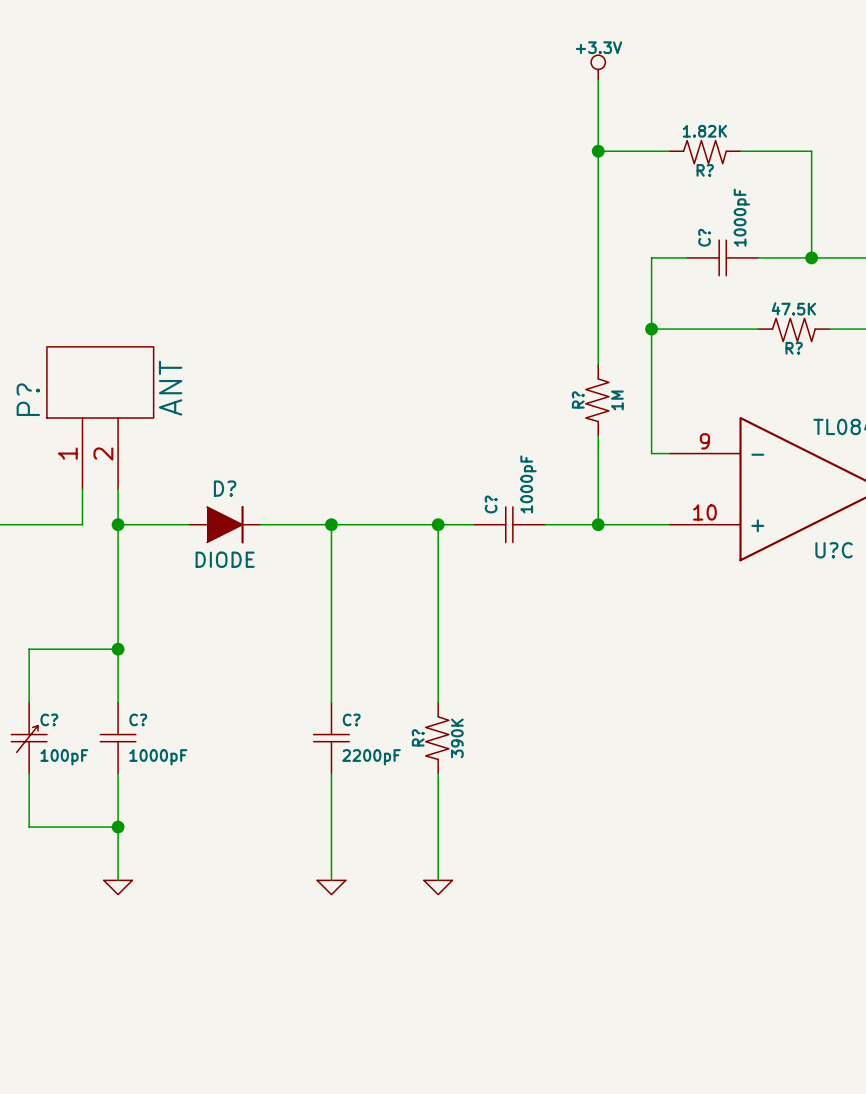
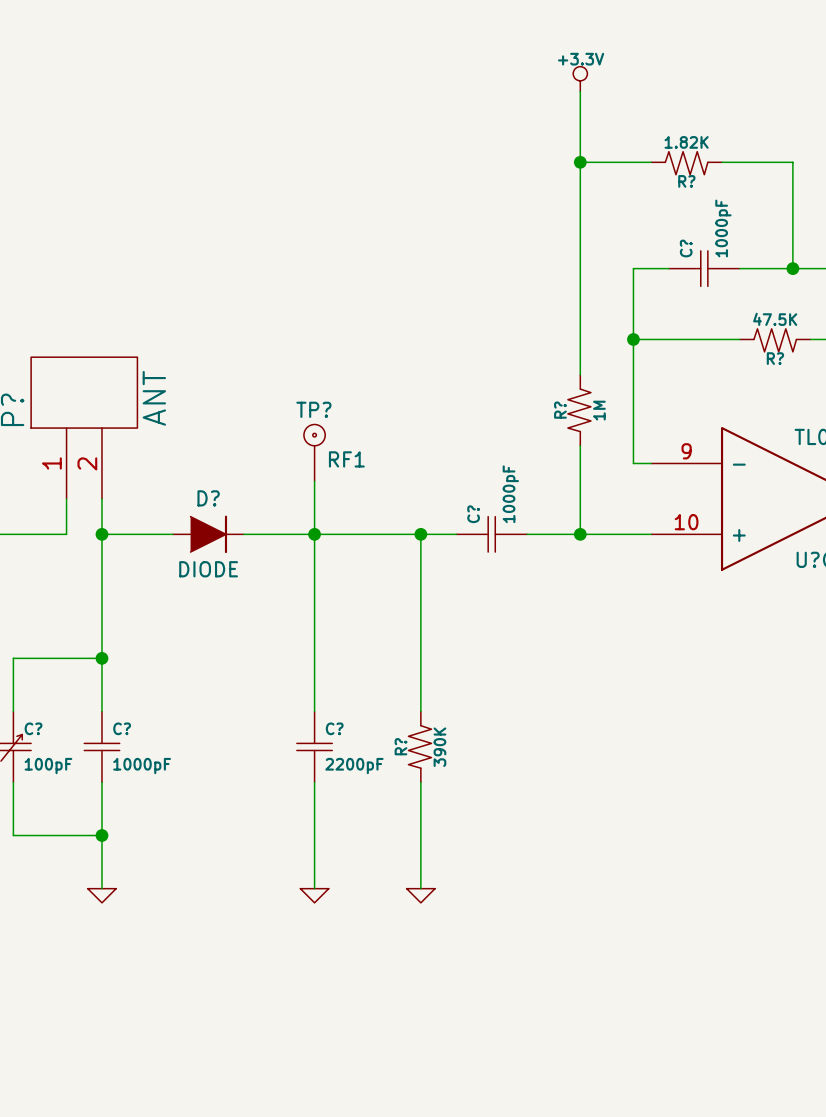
TP?: none -> RF1 (314, 452)
wire: none -> (314, 481) (314, 534)

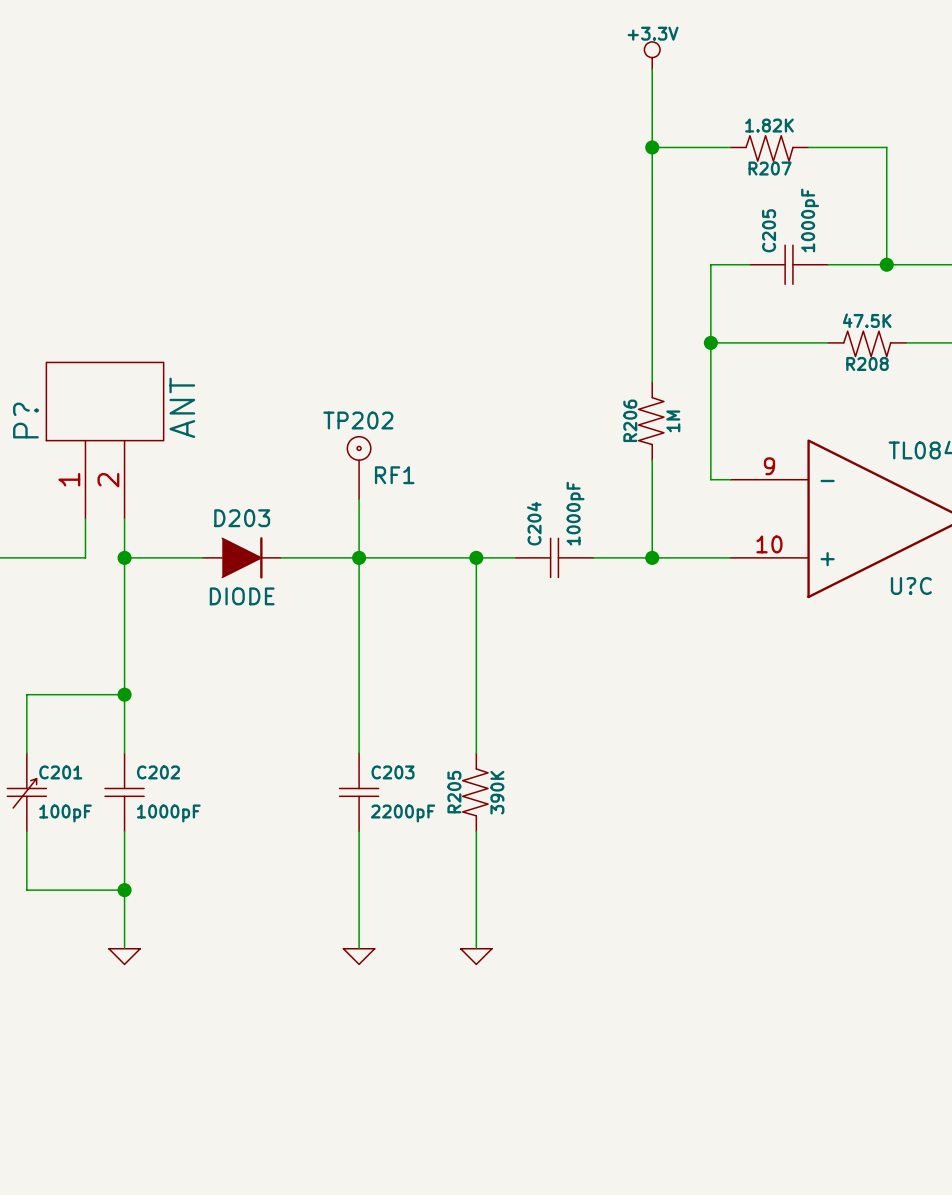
R? name: R? (686, 181) -> R207 (770, 168)
C? name: C? (686, 248) -> C205 (769, 230)
R? name: R? (775, 358) -> R208 (867, 363)
TP? name: TP? (313, 409) -> TP202 (358, 420)
R? name: R? (560, 410) -> R206 (630, 420)
D? name: D? (208, 498) -> D203 (242, 518)
C? name: C? (473, 514) -> C204 (534, 523)
C? name: C? (33, 728) -> C201 (60, 772)
C? name: C? (122, 728) -> C202 (158, 772)
C? name: C? (334, 728) -> C203 (393, 772)
R? name: R? (400, 746) -> R205 (454, 792)

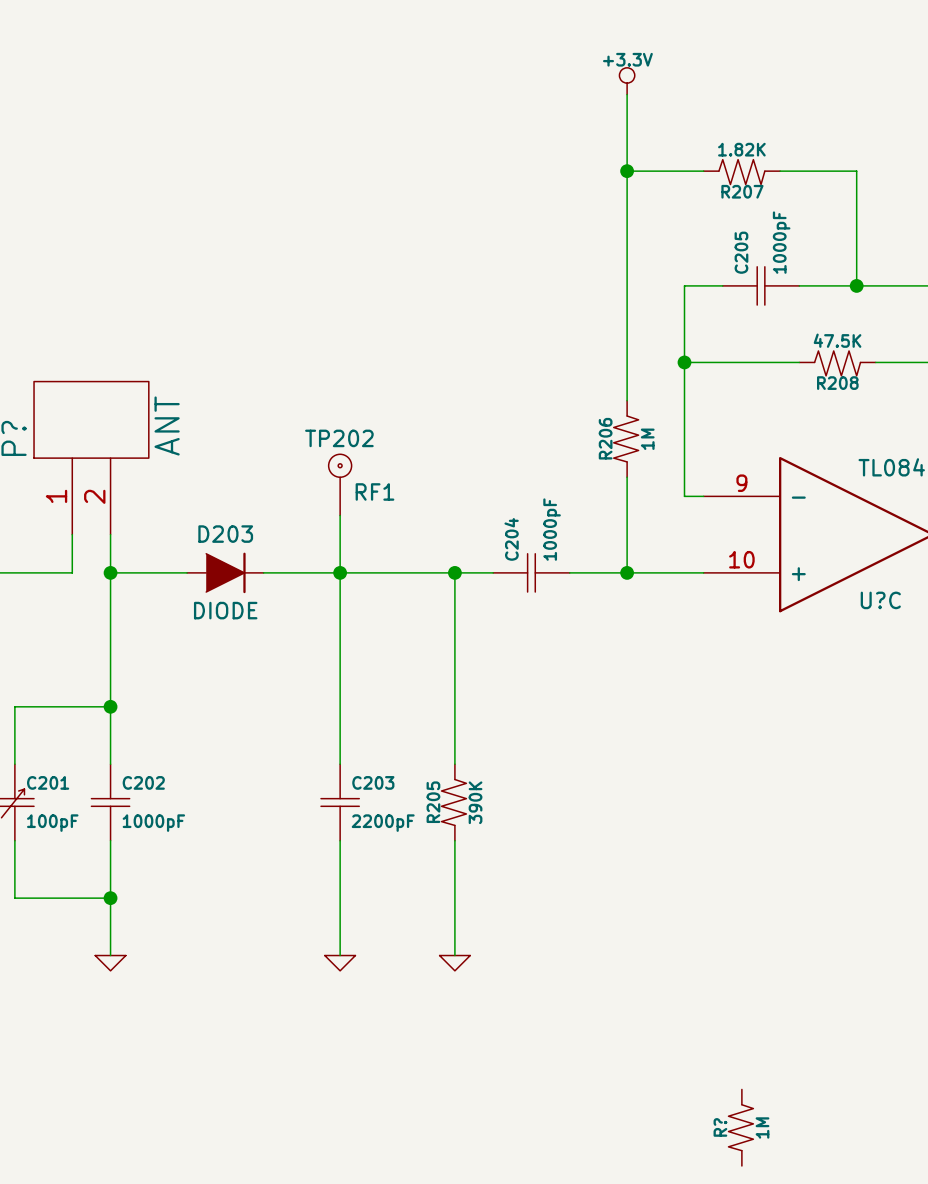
R?: none -> 1M (740, 1127)

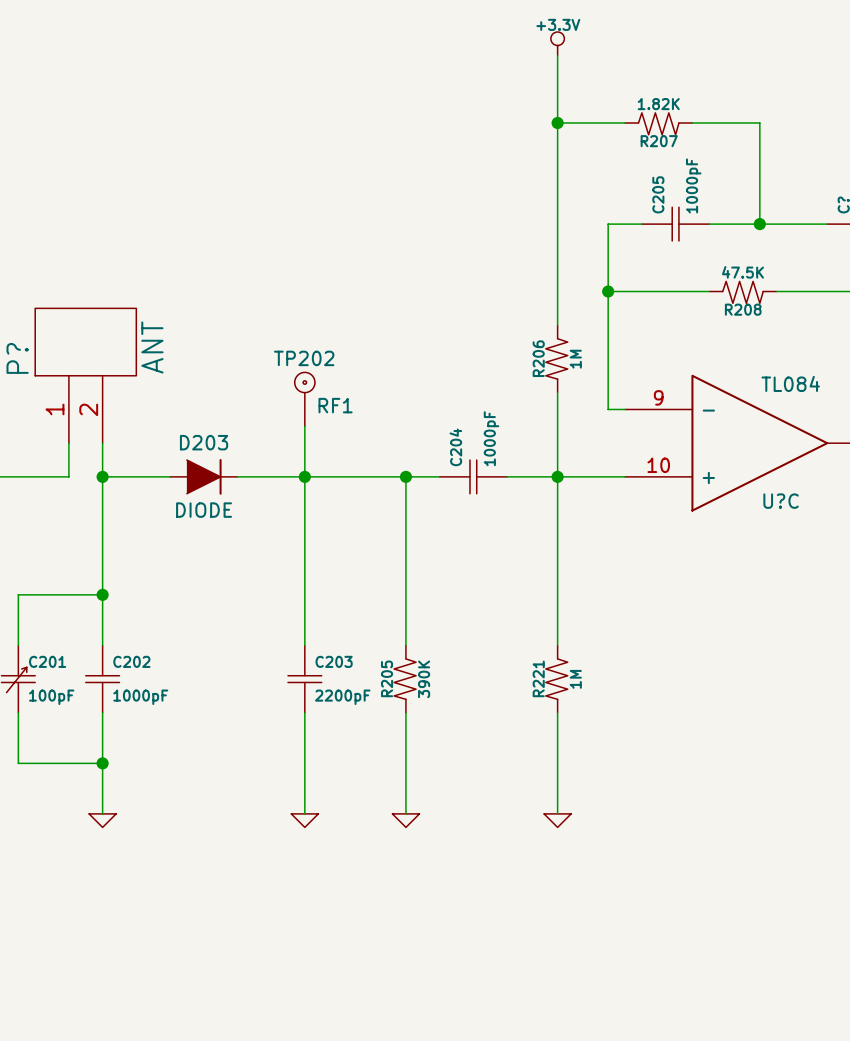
wire: none -> (557, 476) (557, 645)
R221: none -> 1M (556, 679)
wire: none -> (557, 712) (557, 813)
power symbol: none -> (557, 820)
R?: 1M (740, 1127) -> none

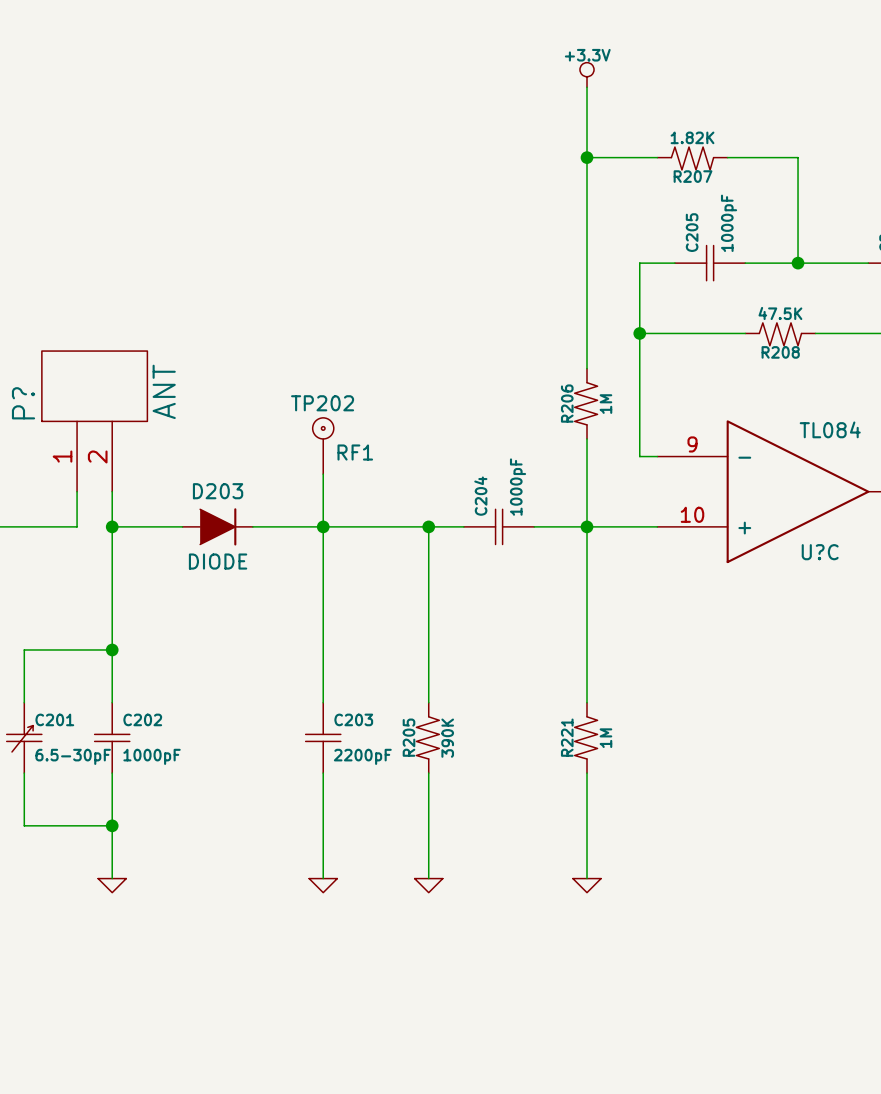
C201 value: 100pF (51, 697) -> 6.5-30pF (73, 756)

